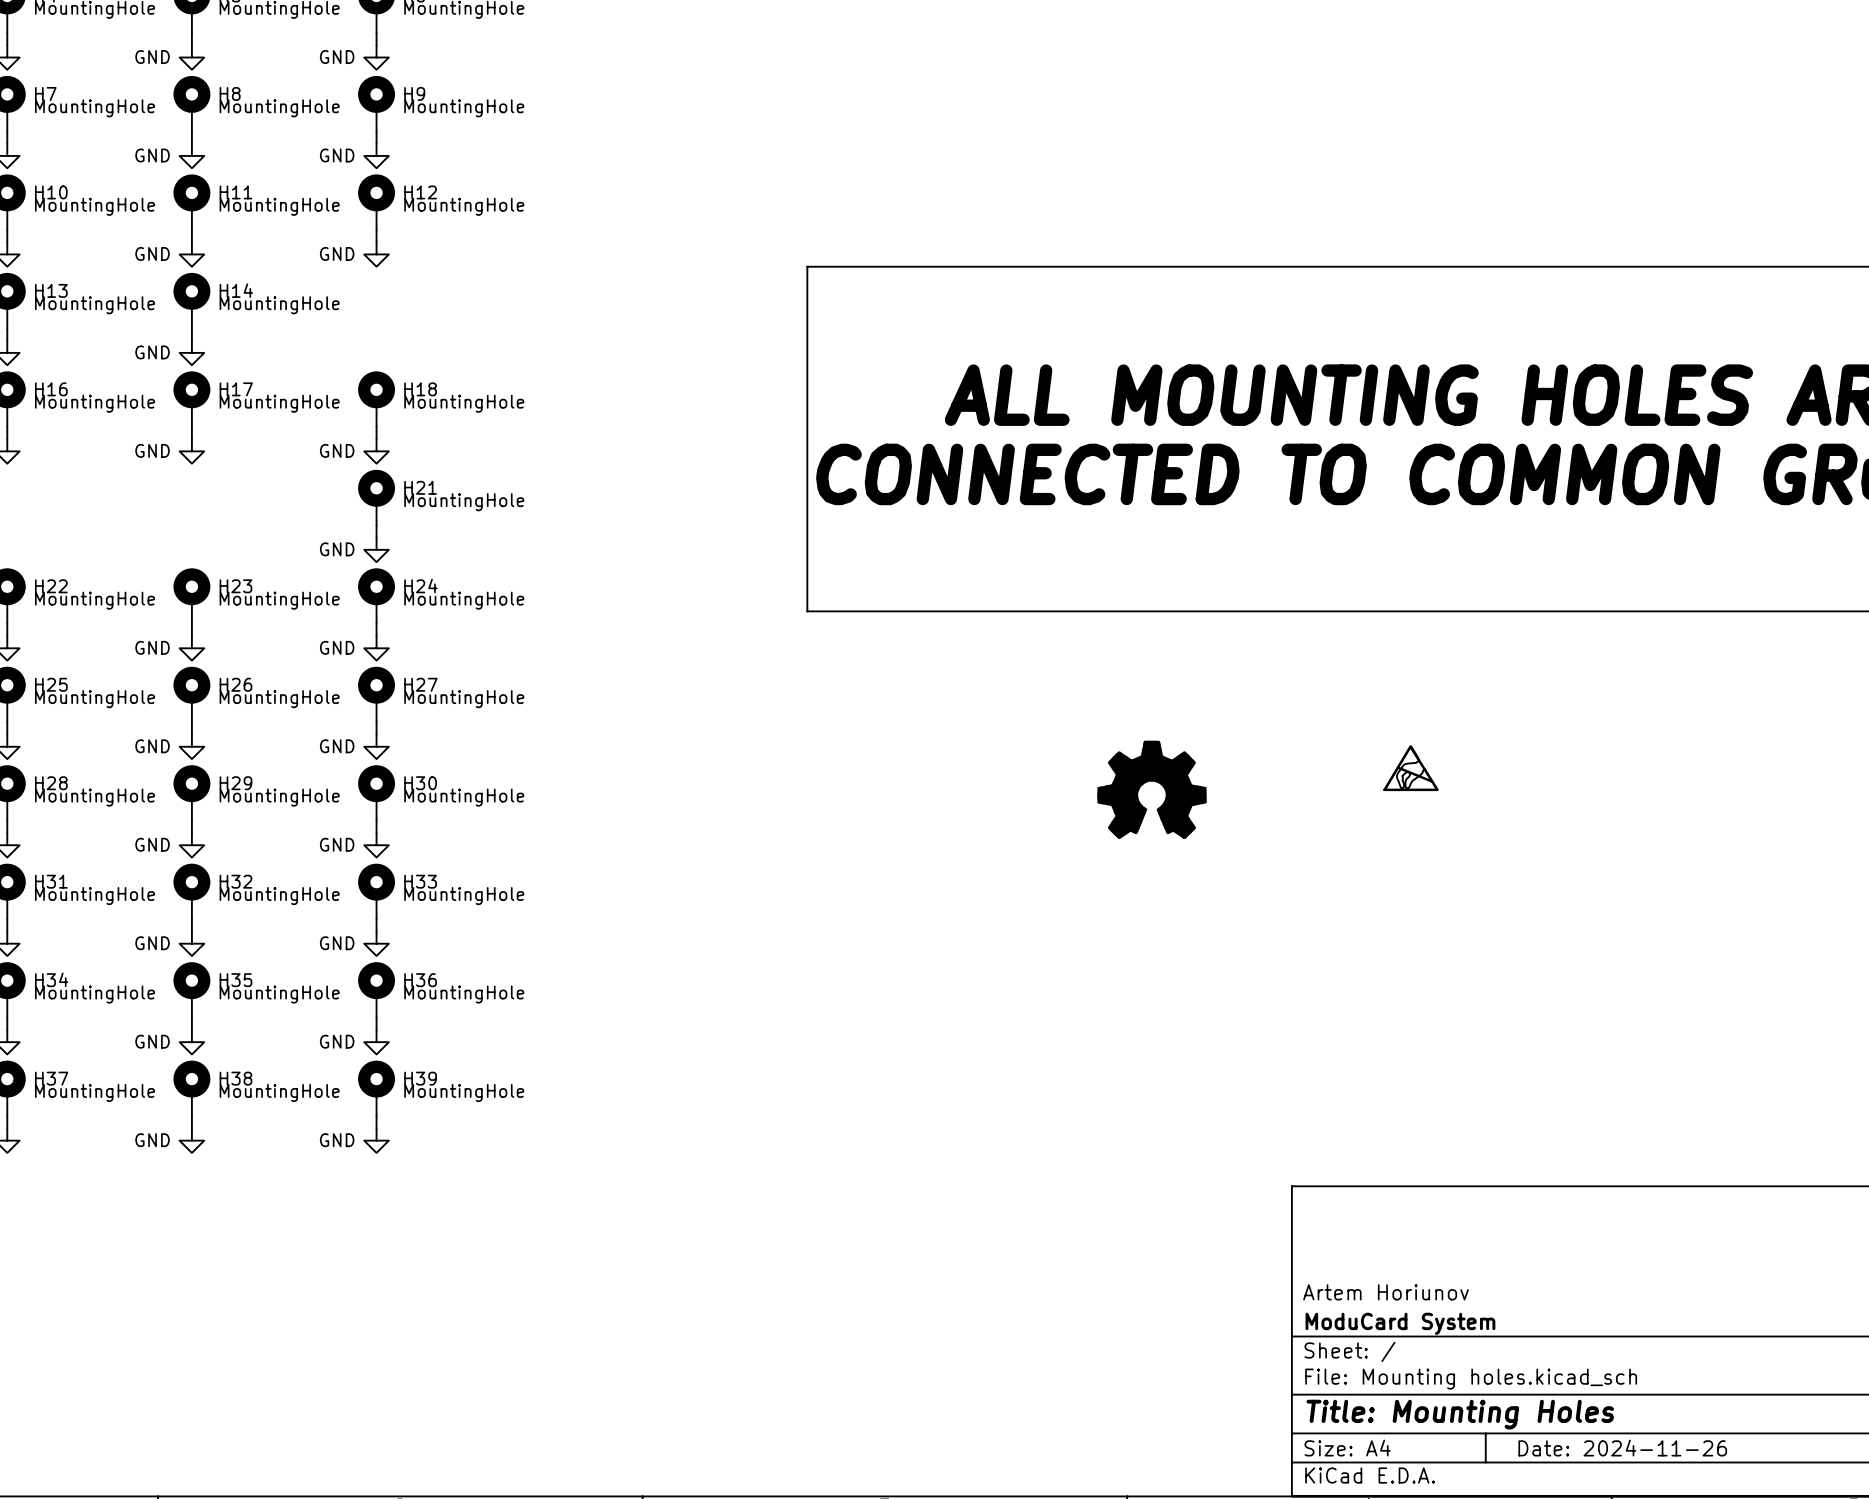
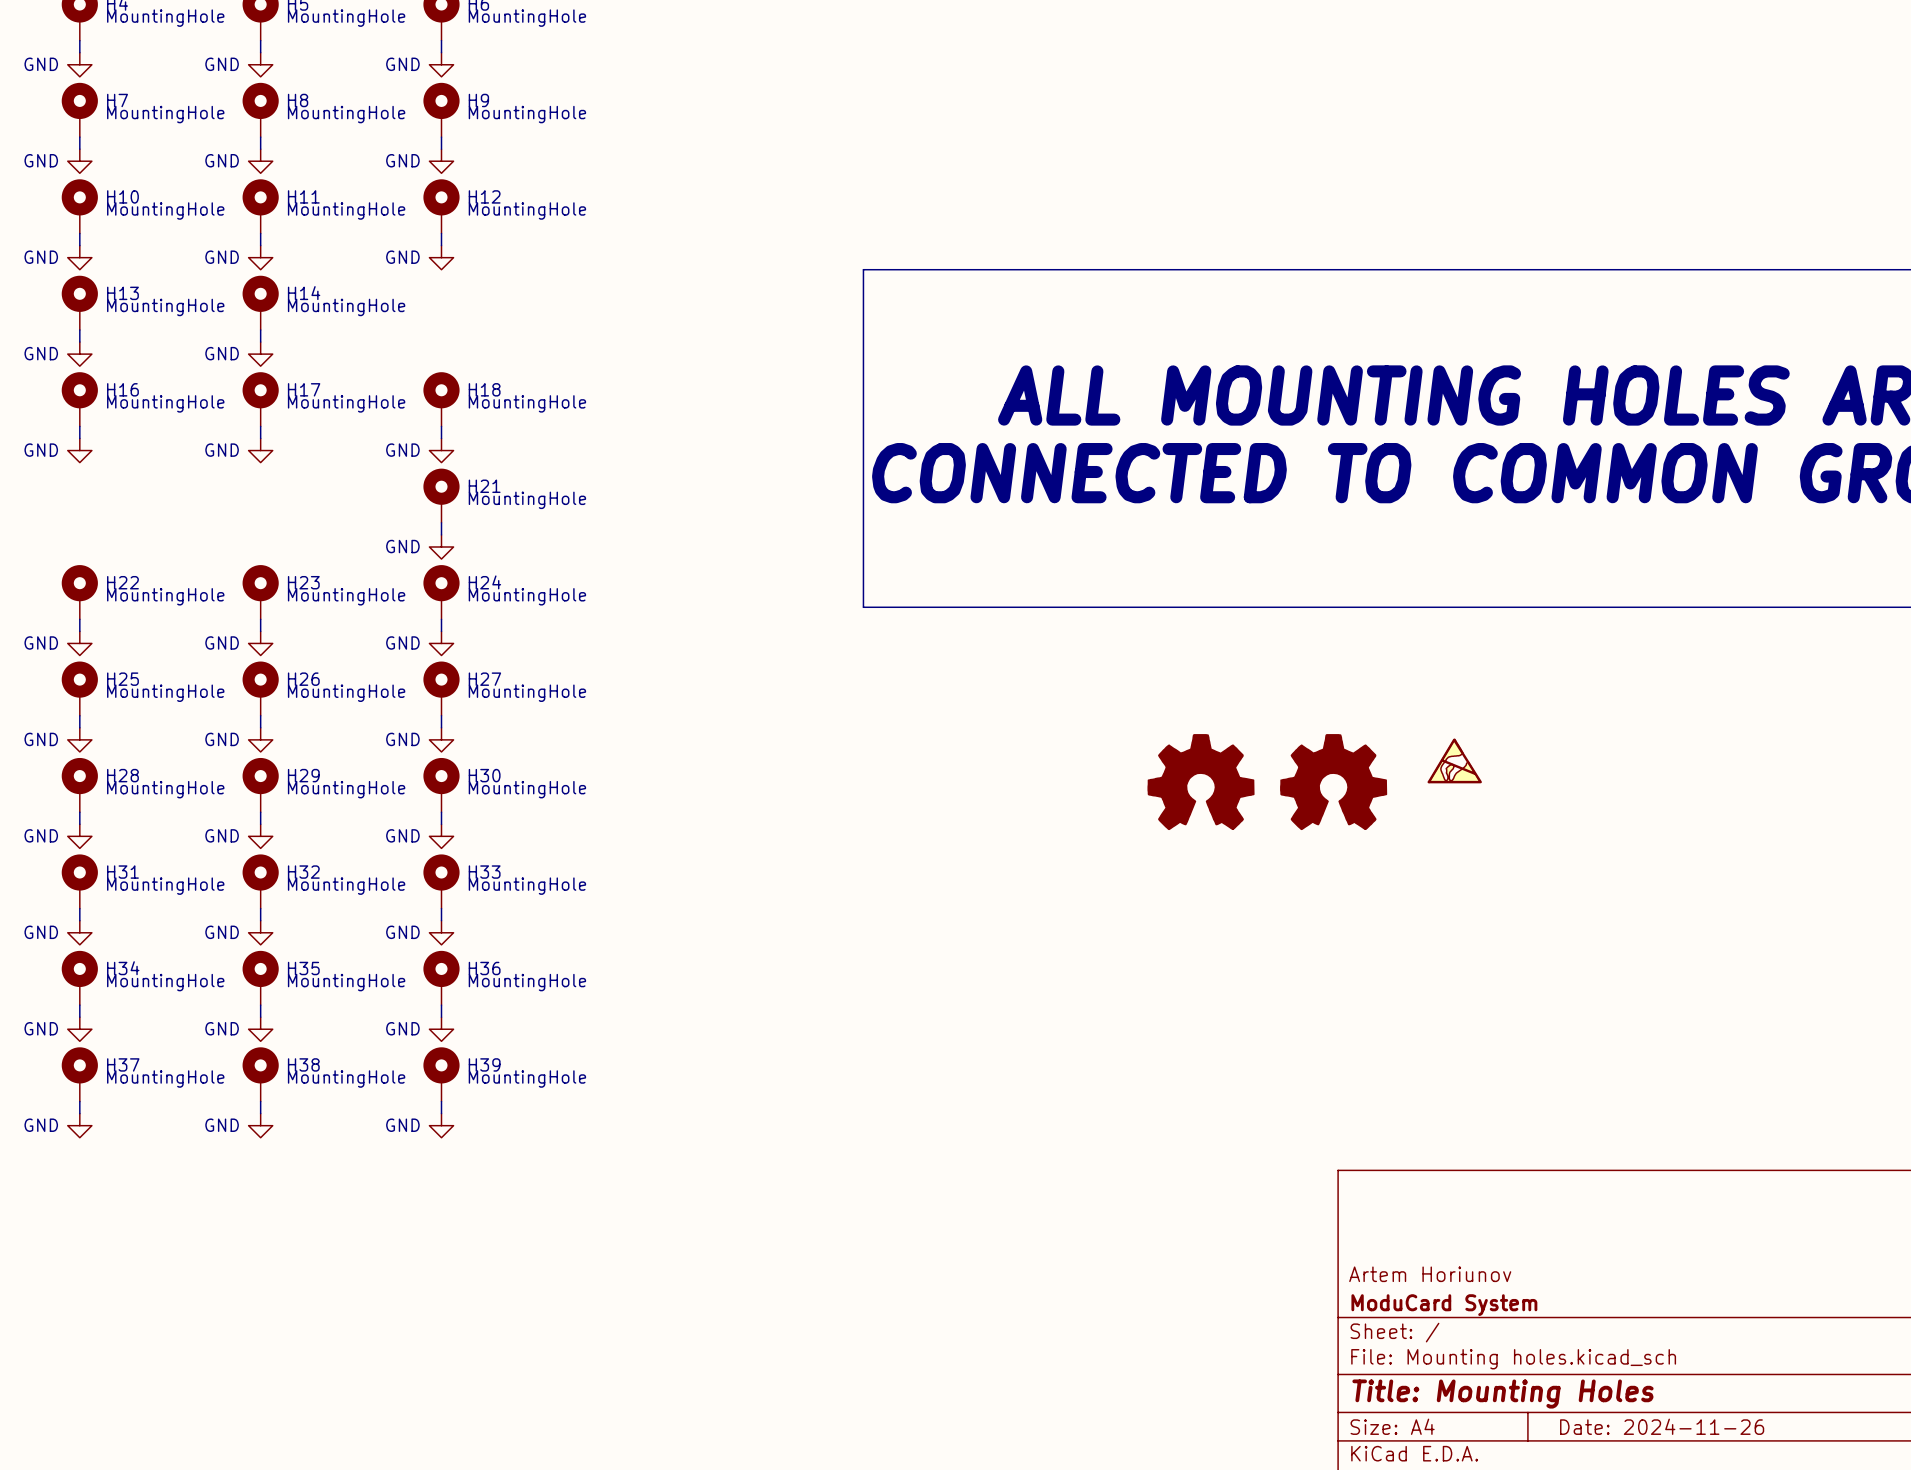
power symbol: none -> (1333, 782)

